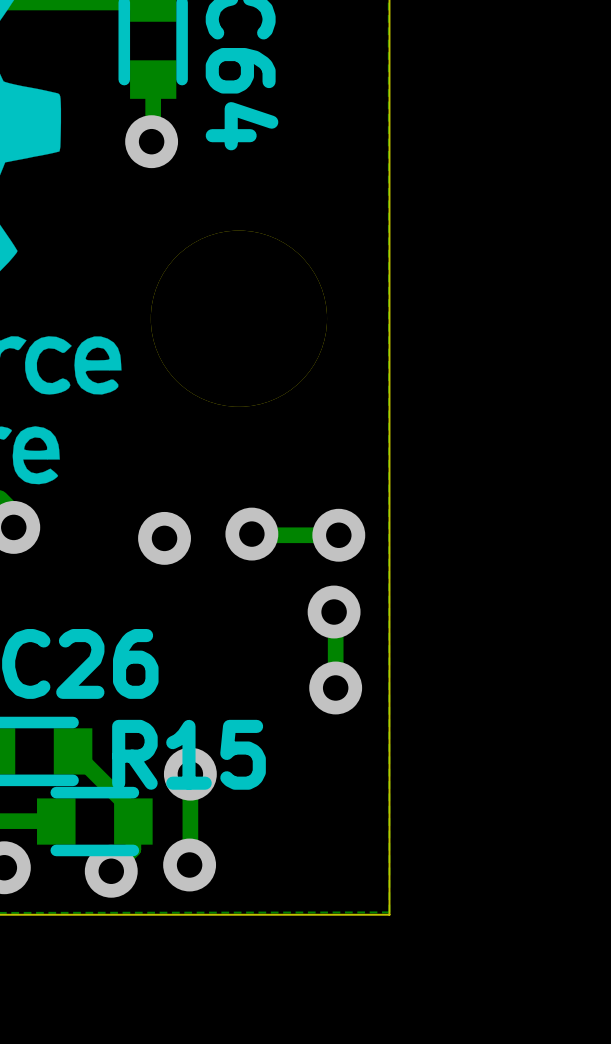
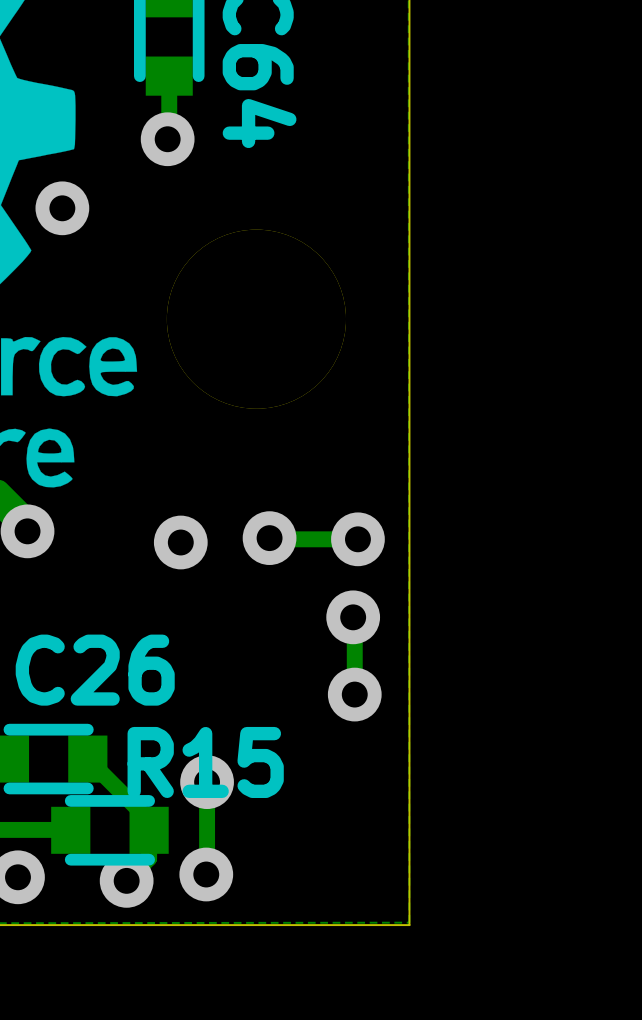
via: none -> (62, 208)

